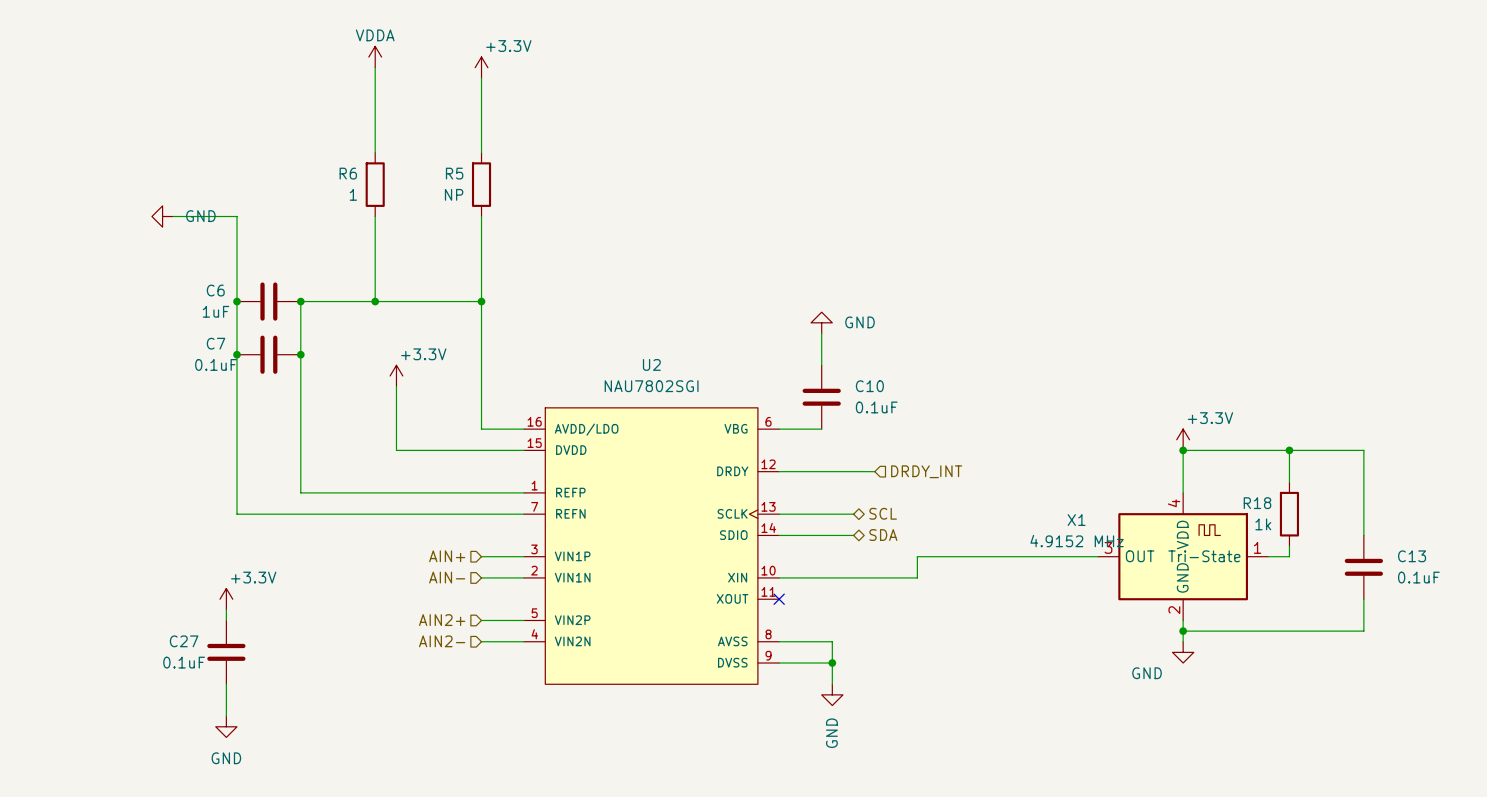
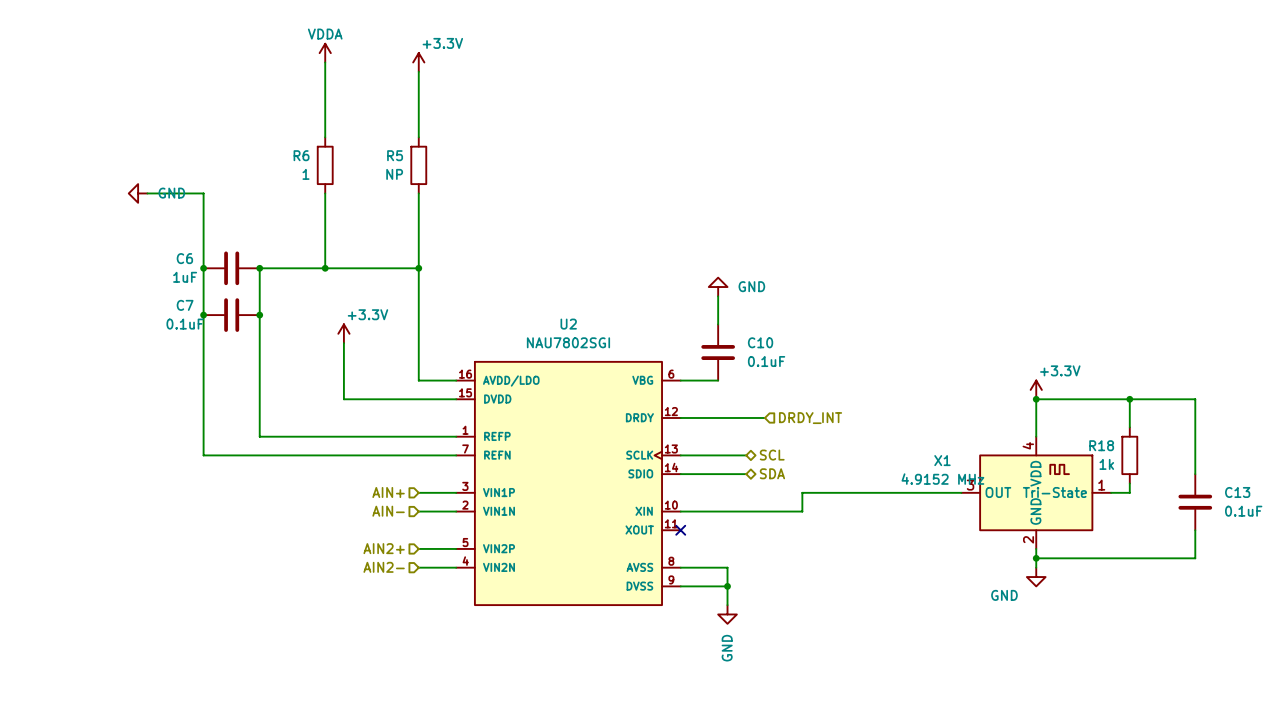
power symbol: +3.3V (226, 599) -> none
wire: (226, 609) (226, 620) -> none
C27: 0.1uF (226, 652) -> none
wire: (226, 684) (226, 716) -> none
power symbol: GND (226, 726) -> none

